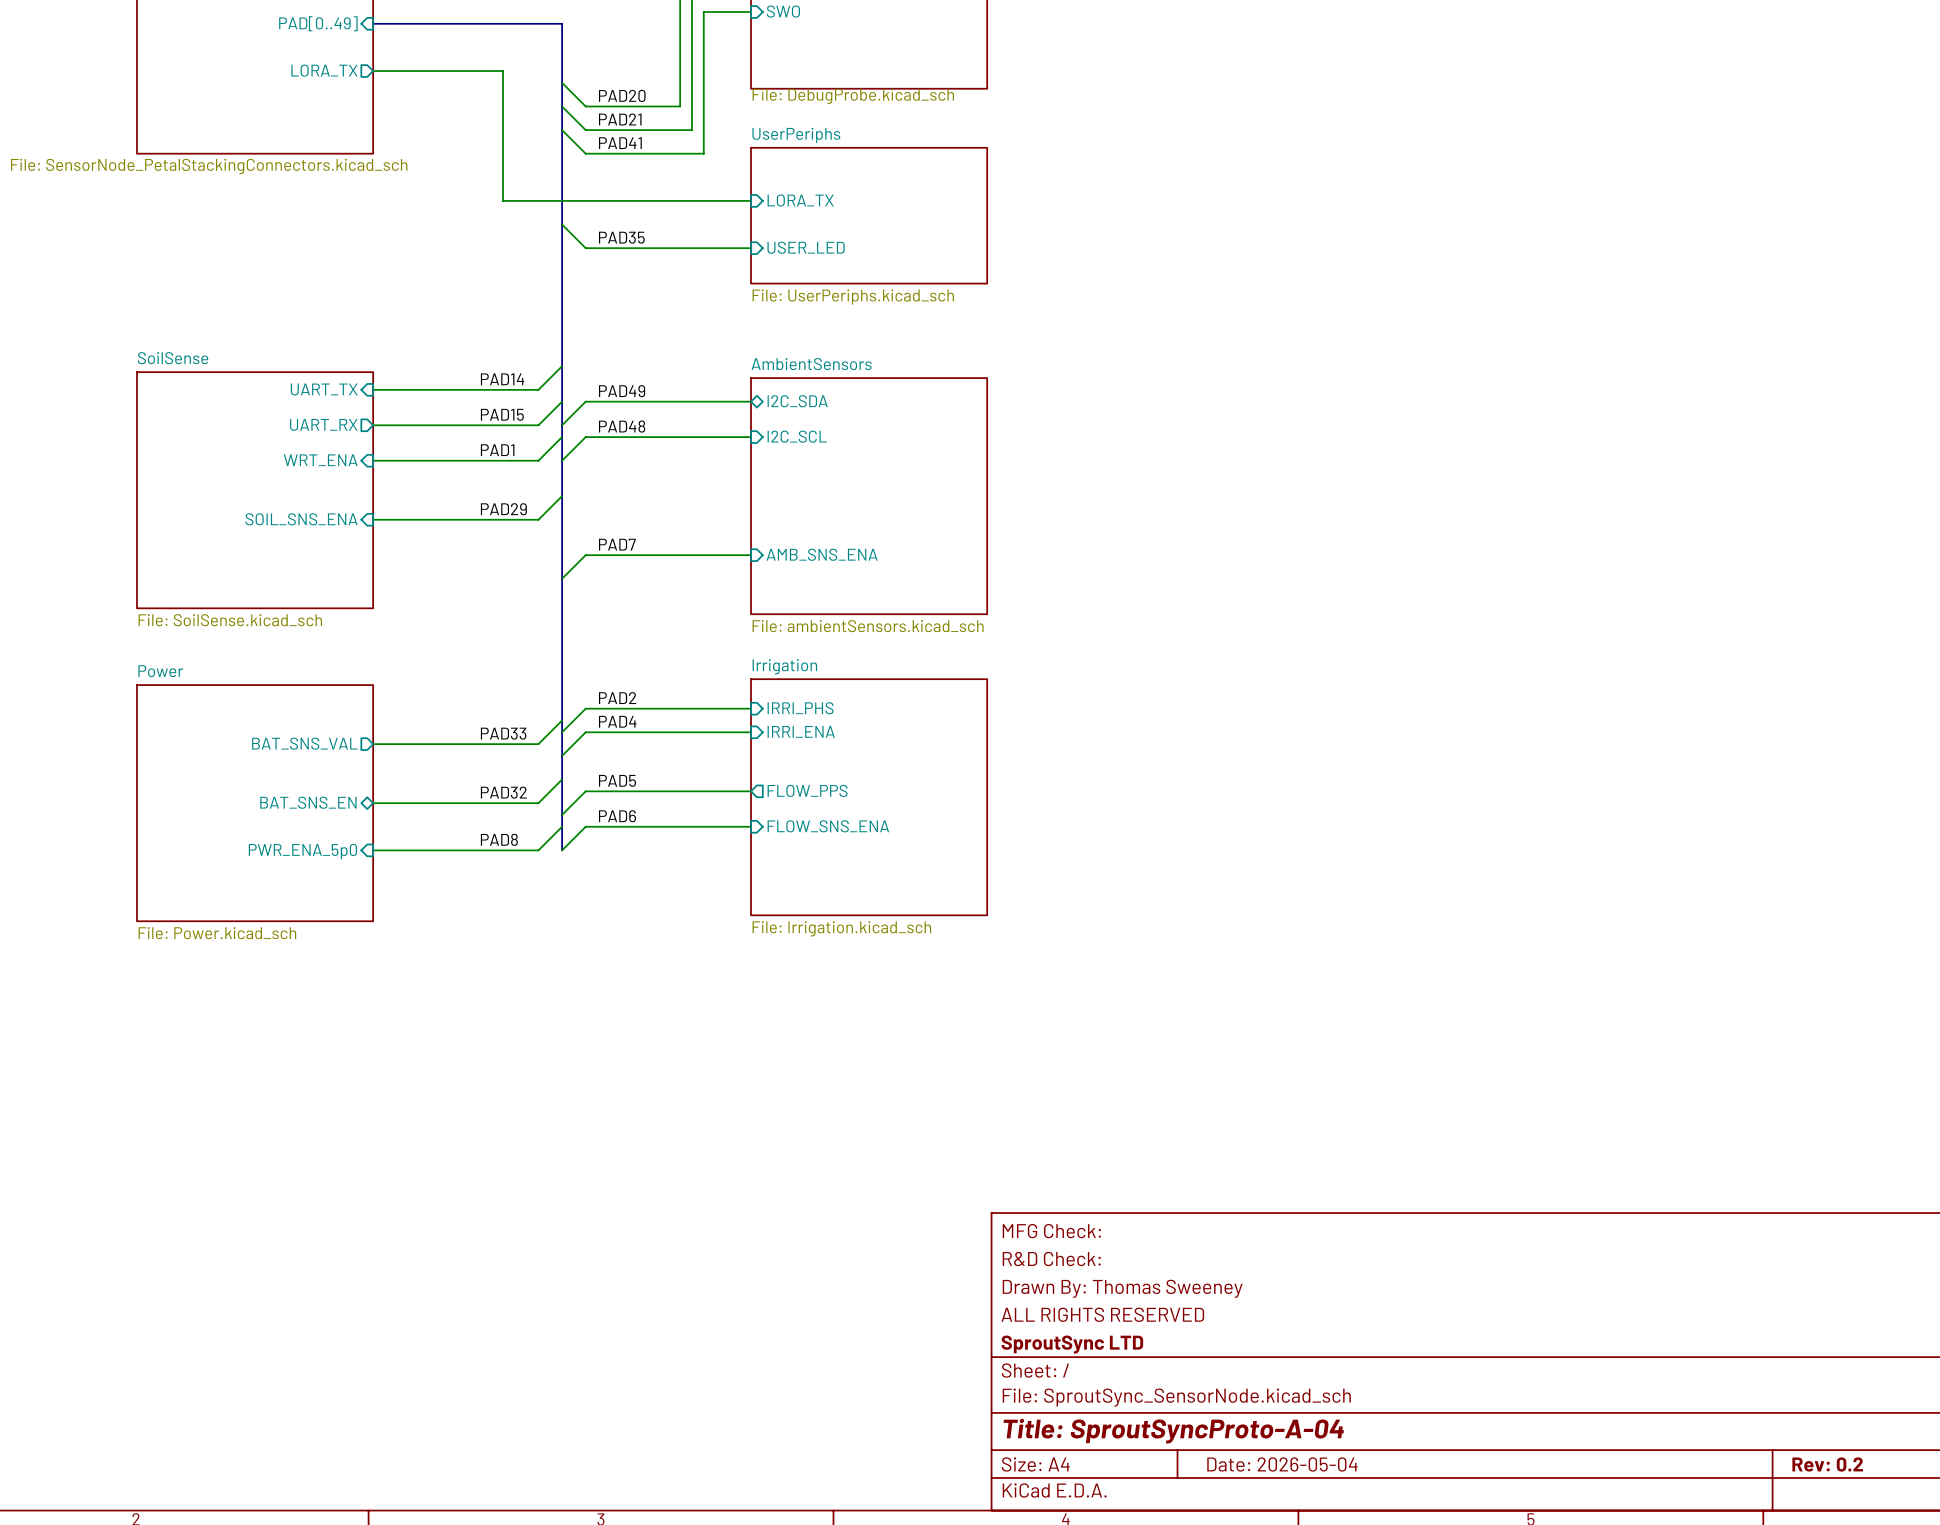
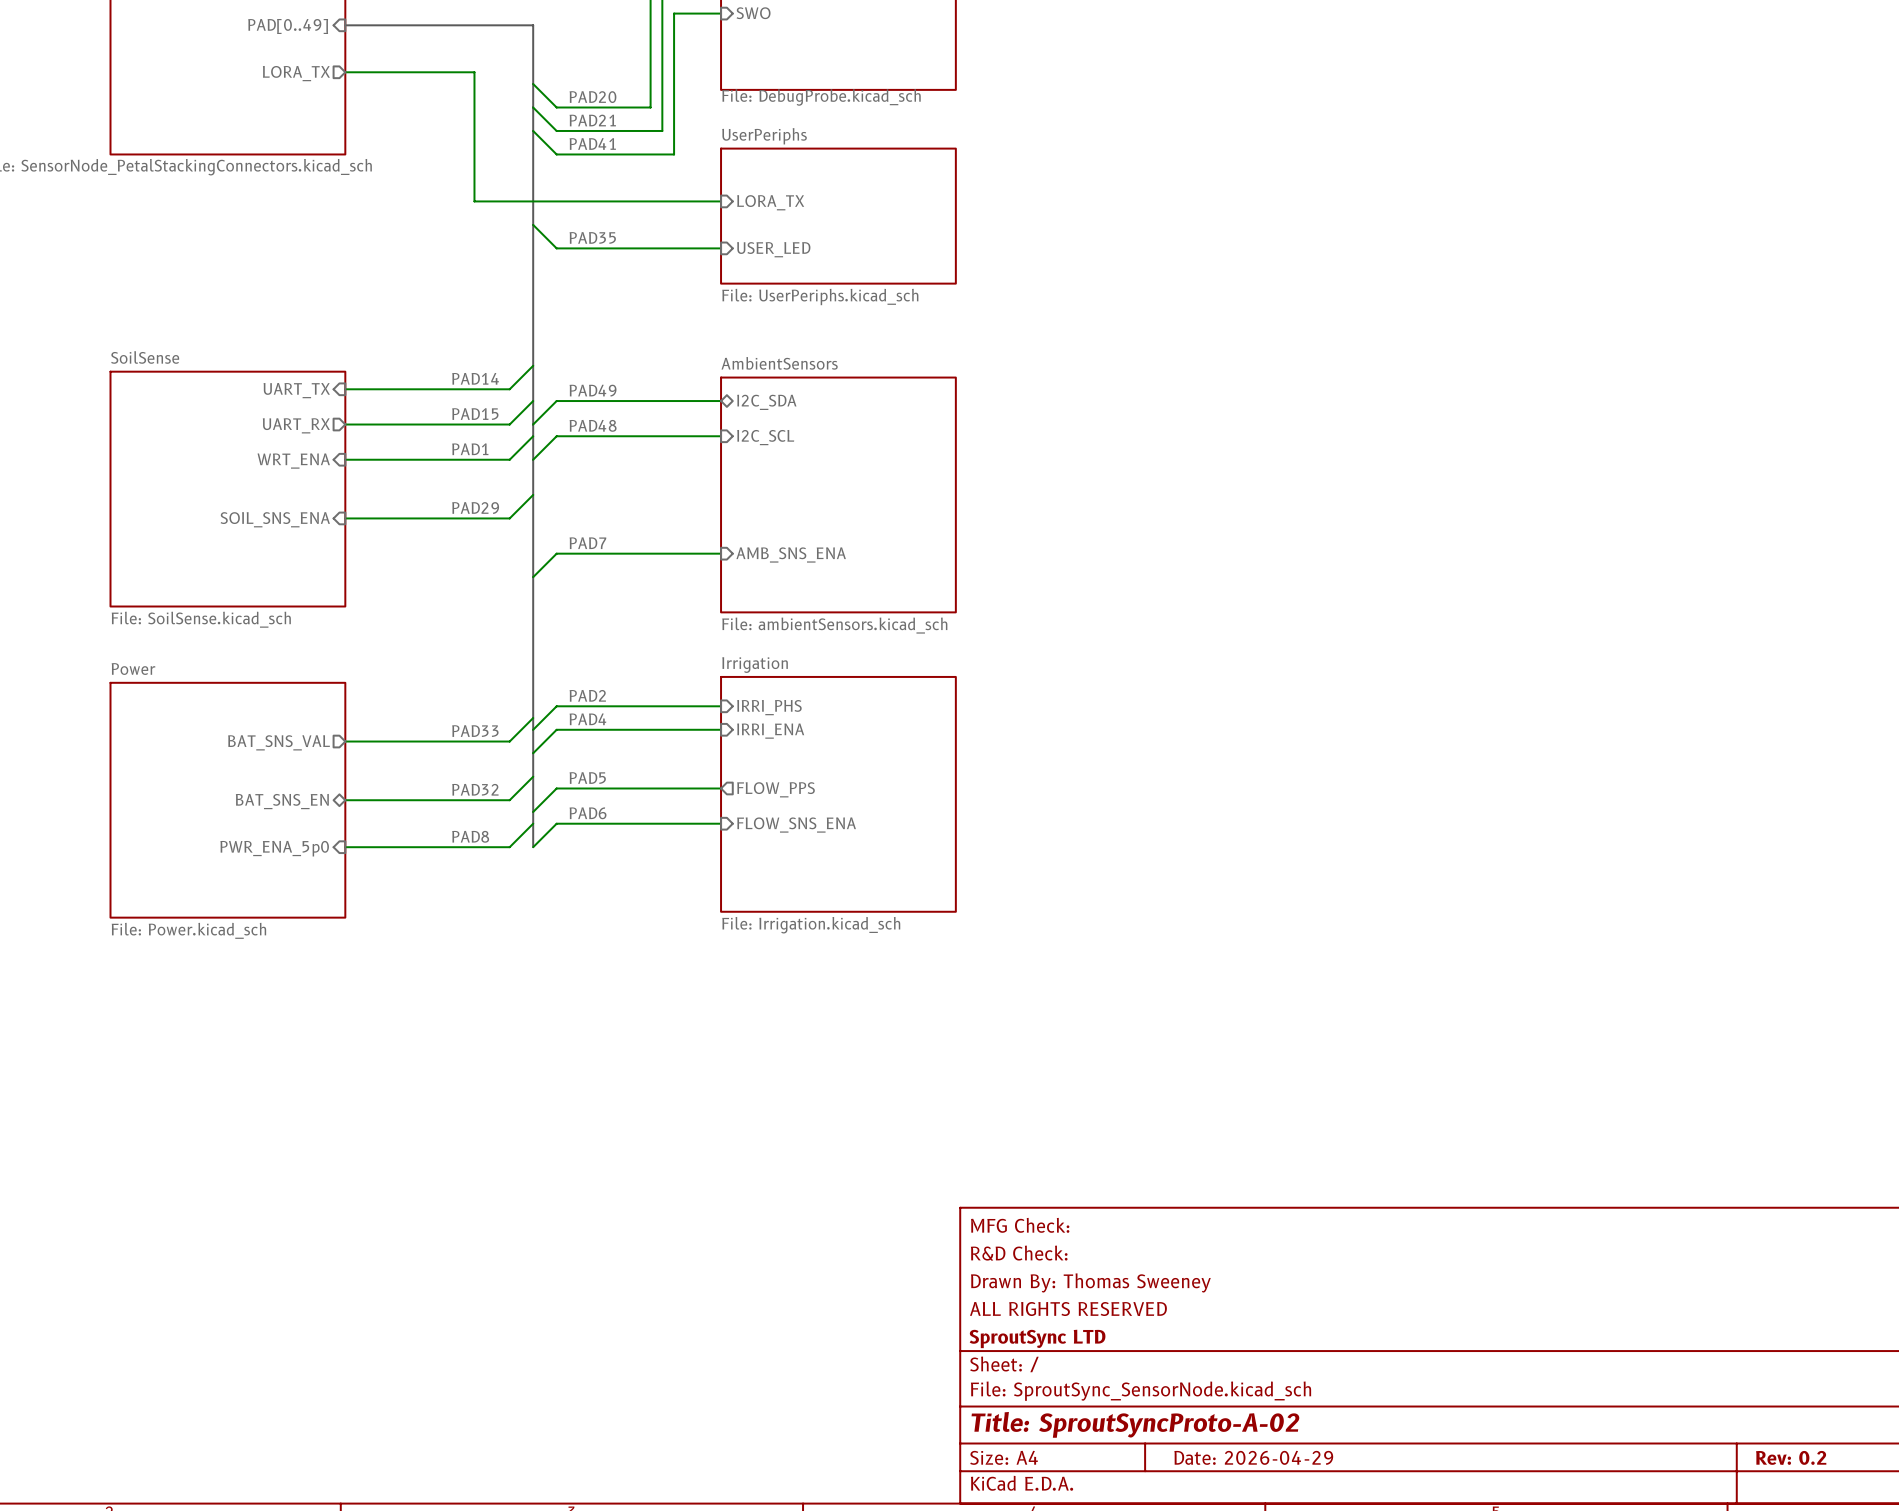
title block: Title: SproutSyncProto-A-04 (1173, 1431) -> Title: SproutSyncProto-A-02 (1135, 1424)
title block: Date: 2026-05-04 (1282, 1464) -> Date: 2026-04-29 (1253, 1457)

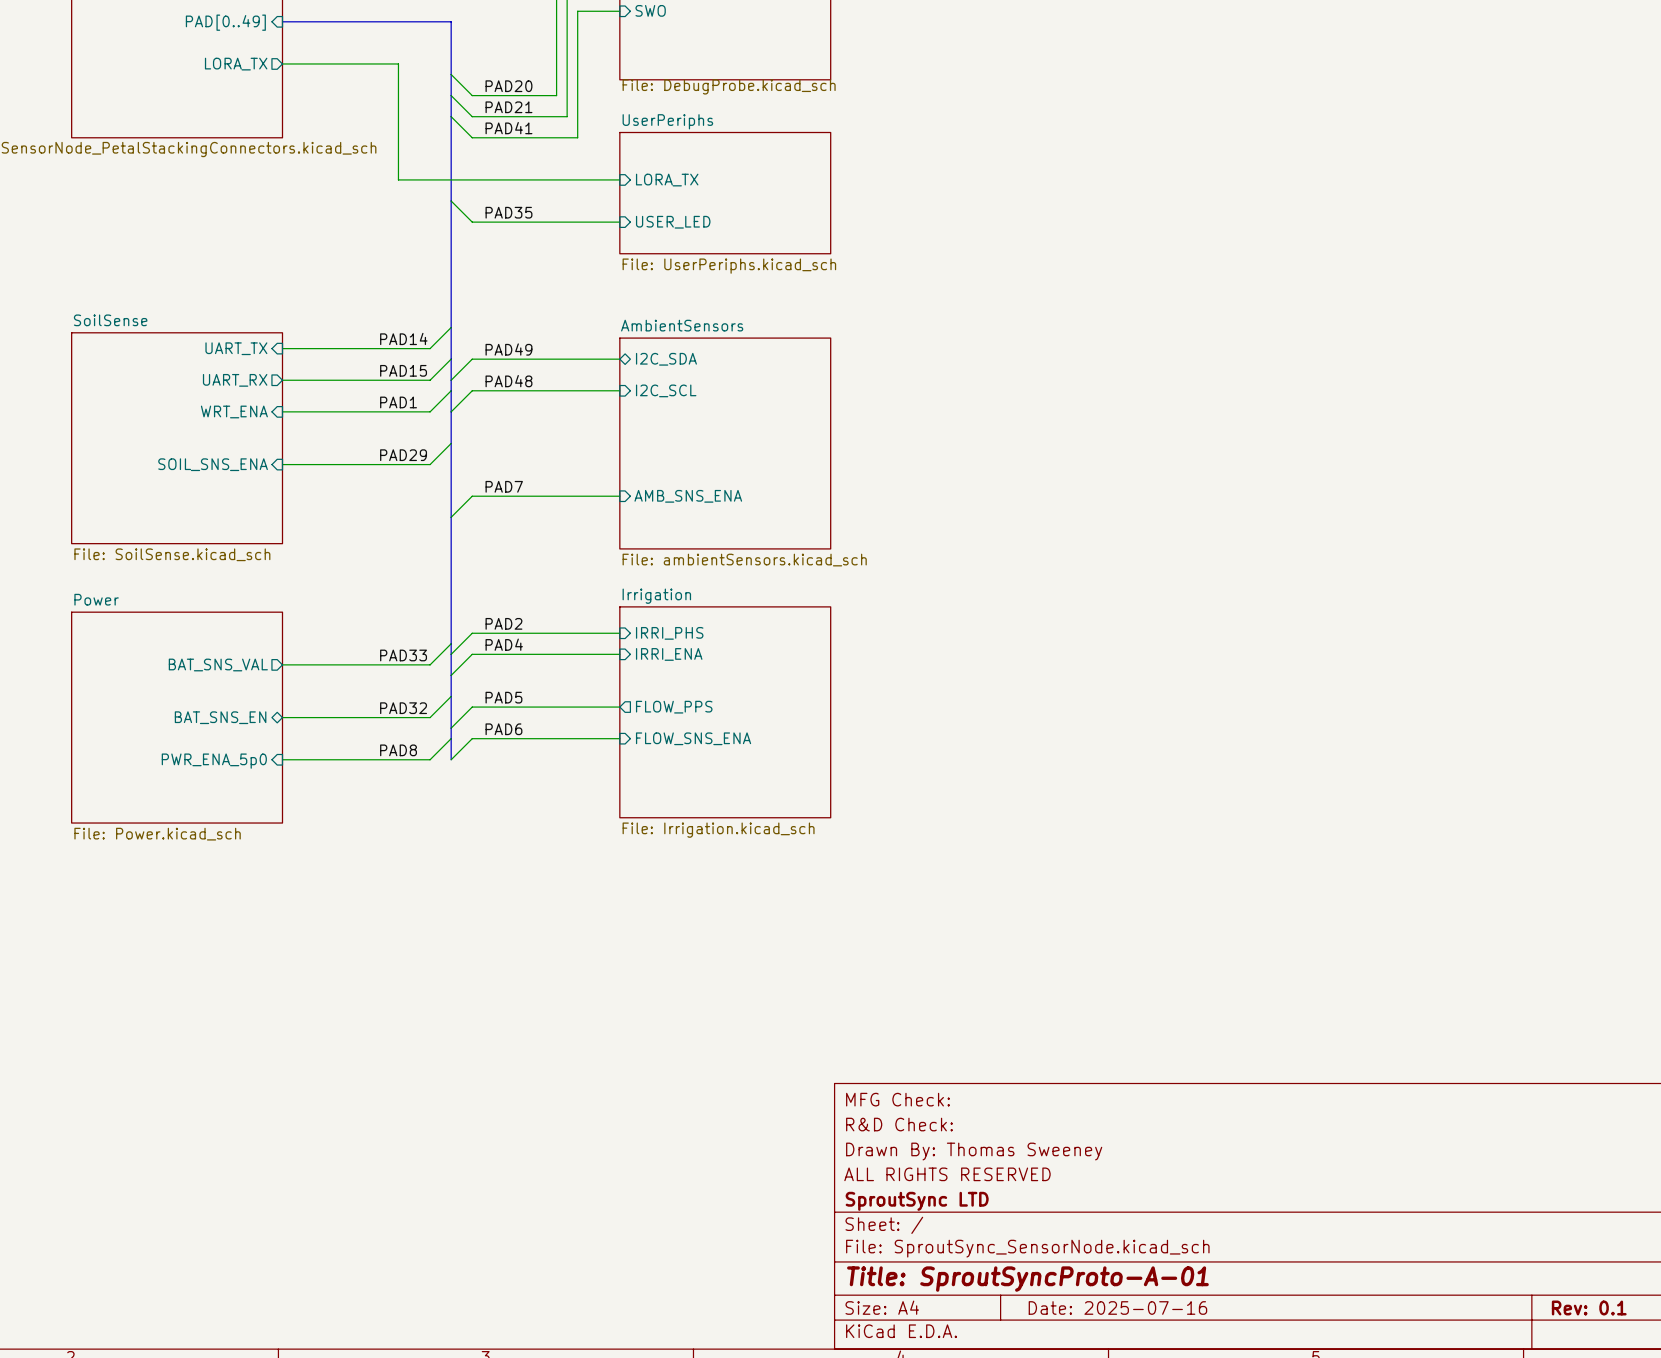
title block: Title: SproutSyncProto-A-02 (1135, 1424) -> Title: SproutSyncProto-A-01 (1027, 1279)
title block: Date: 2026-04-29 (1253, 1457) -> Date: 2025-07-16 (1117, 1307)
title block: Rev: 0.2 (1791, 1457) -> Rev: 0.1 (1589, 1307)

